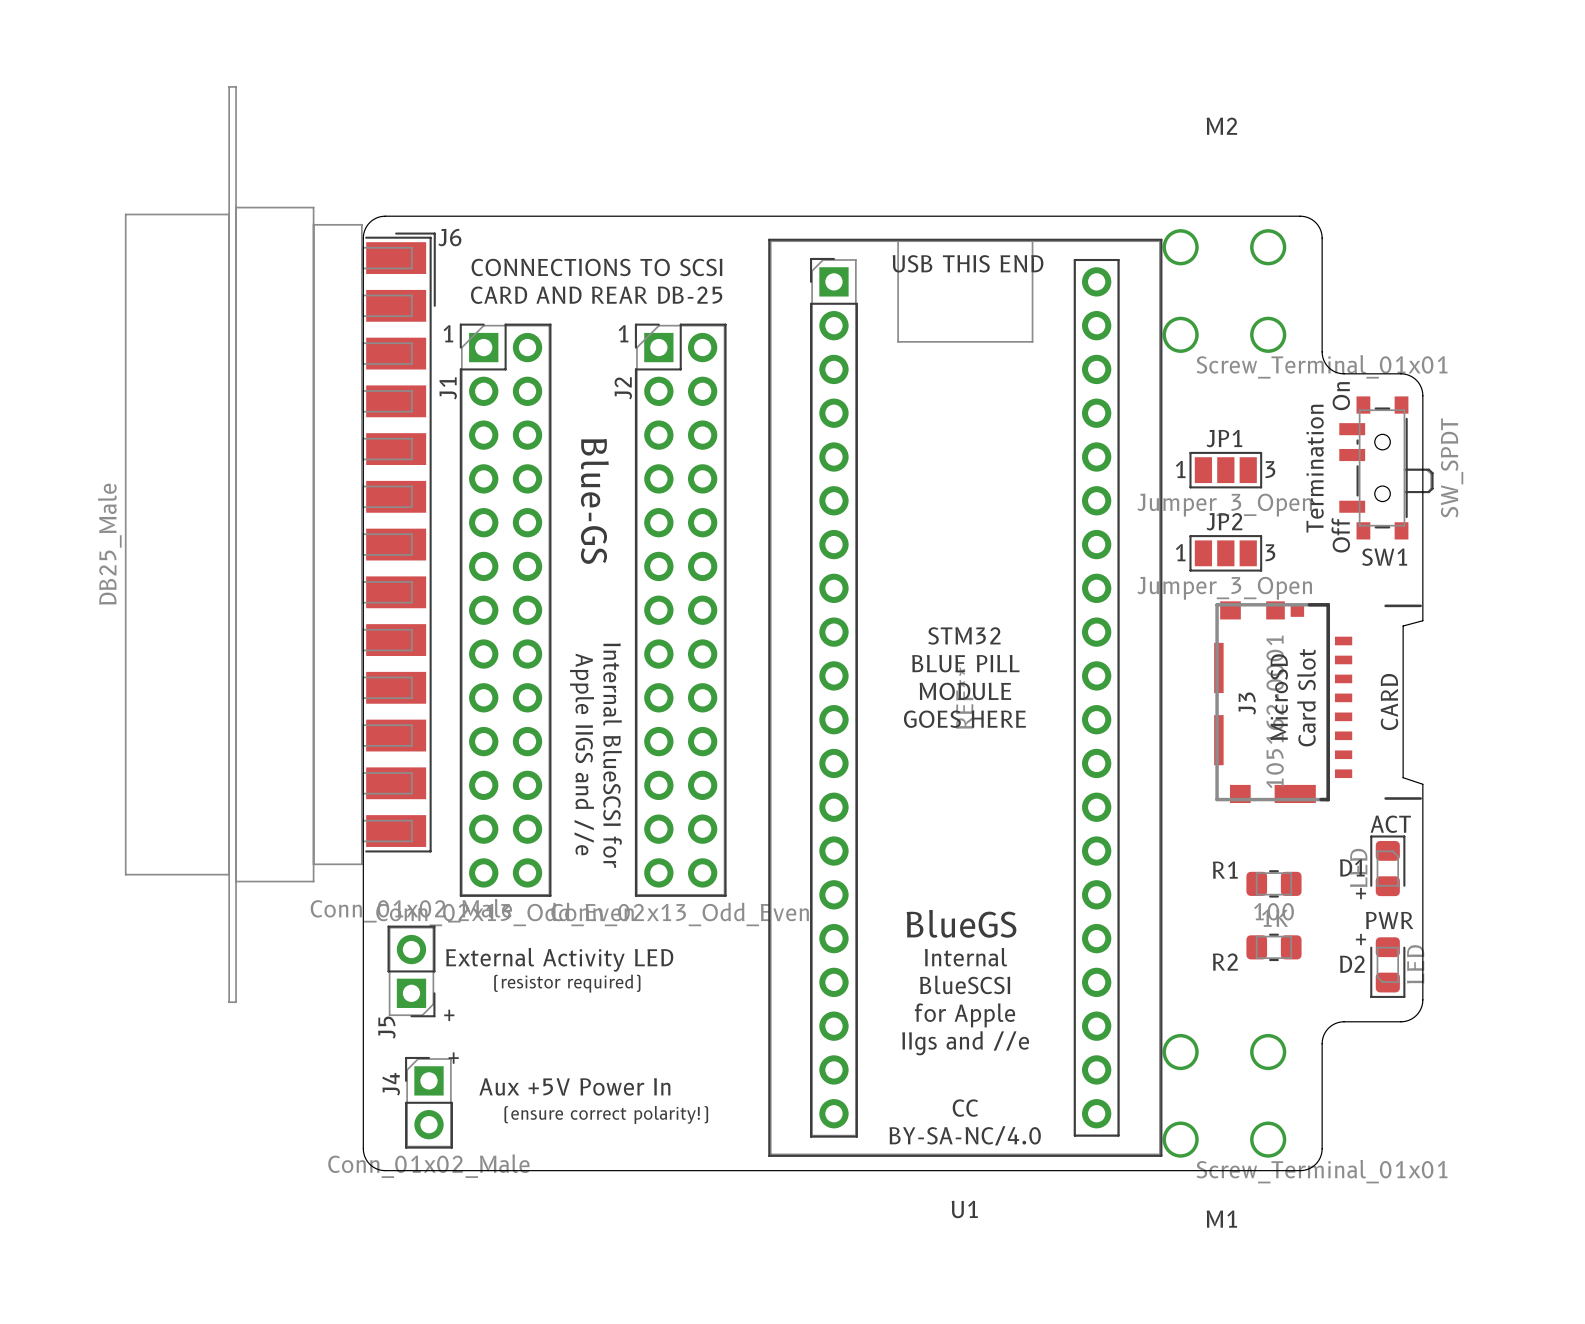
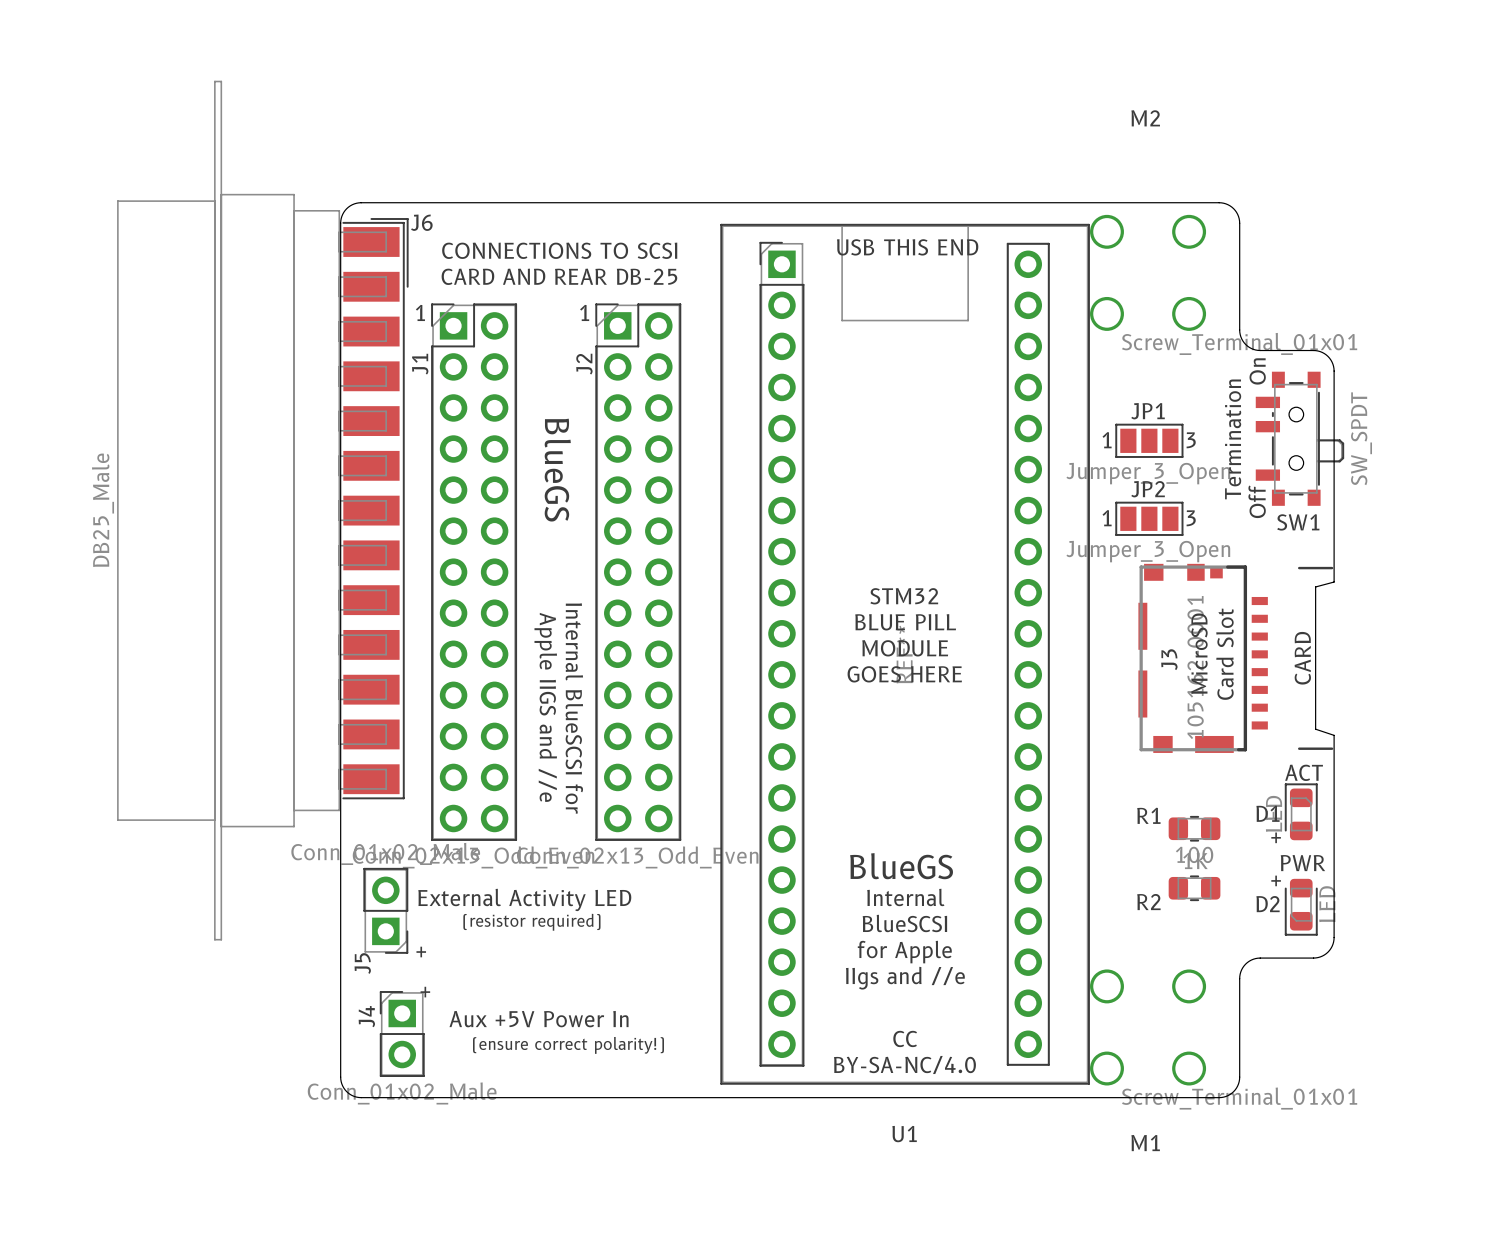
text: Blue-GS (594, 501) -> BlueGS (557, 470)

